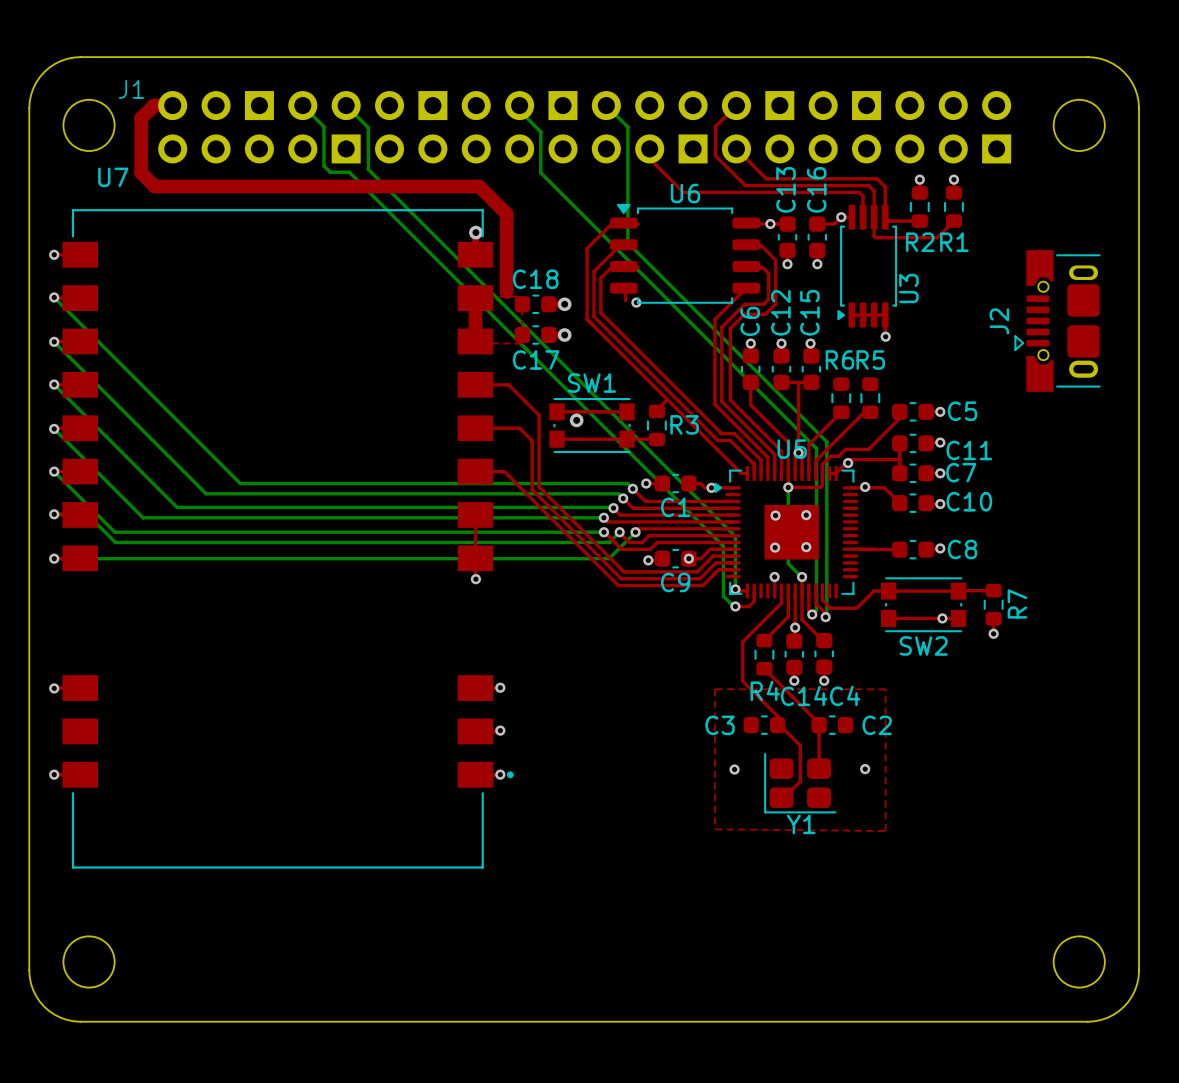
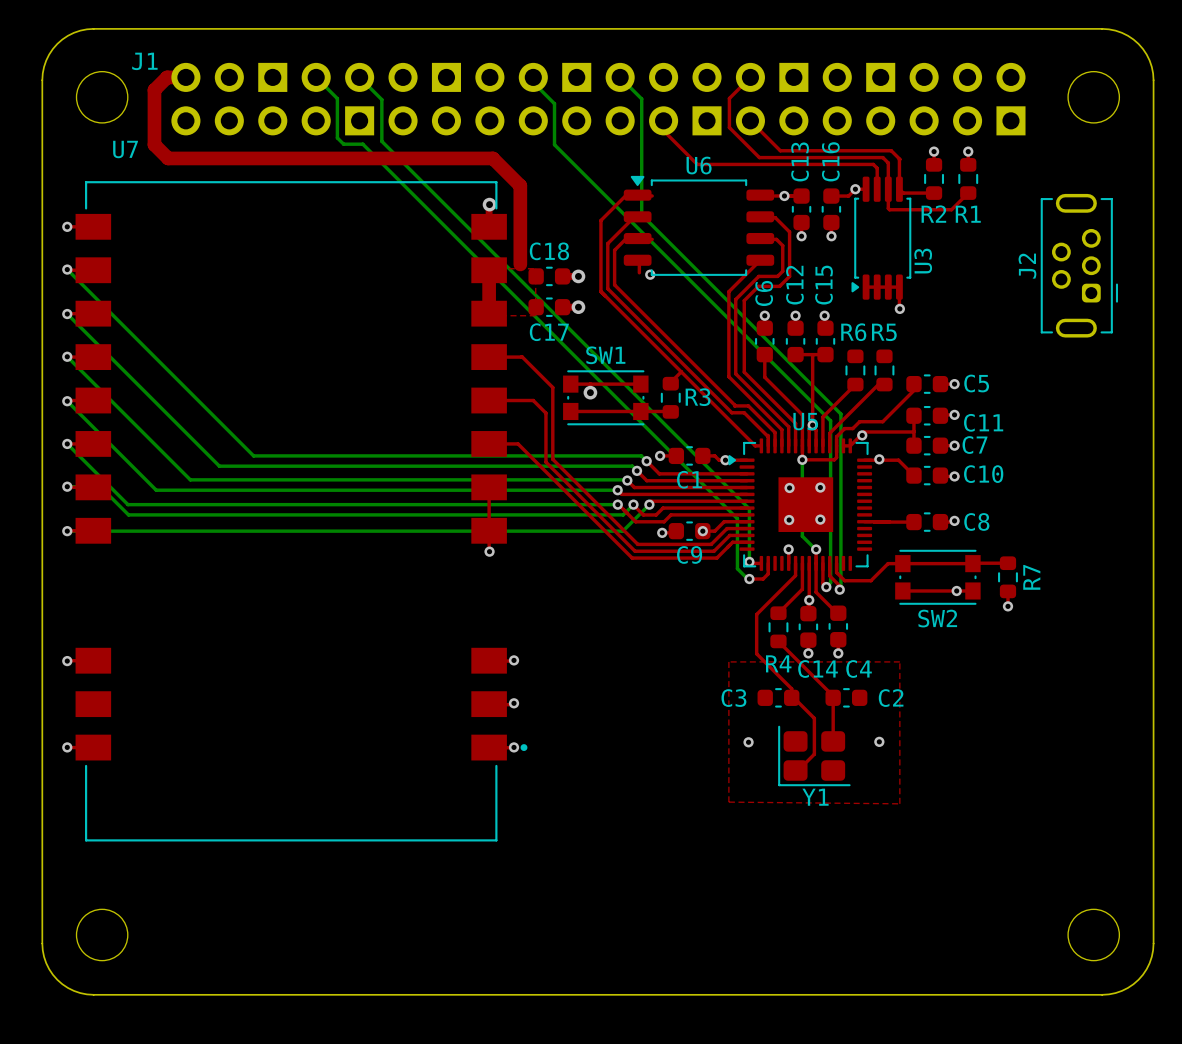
J2 footprint: [1014, 250, 1101, 392] -> [1040, 193, 1119, 338]

